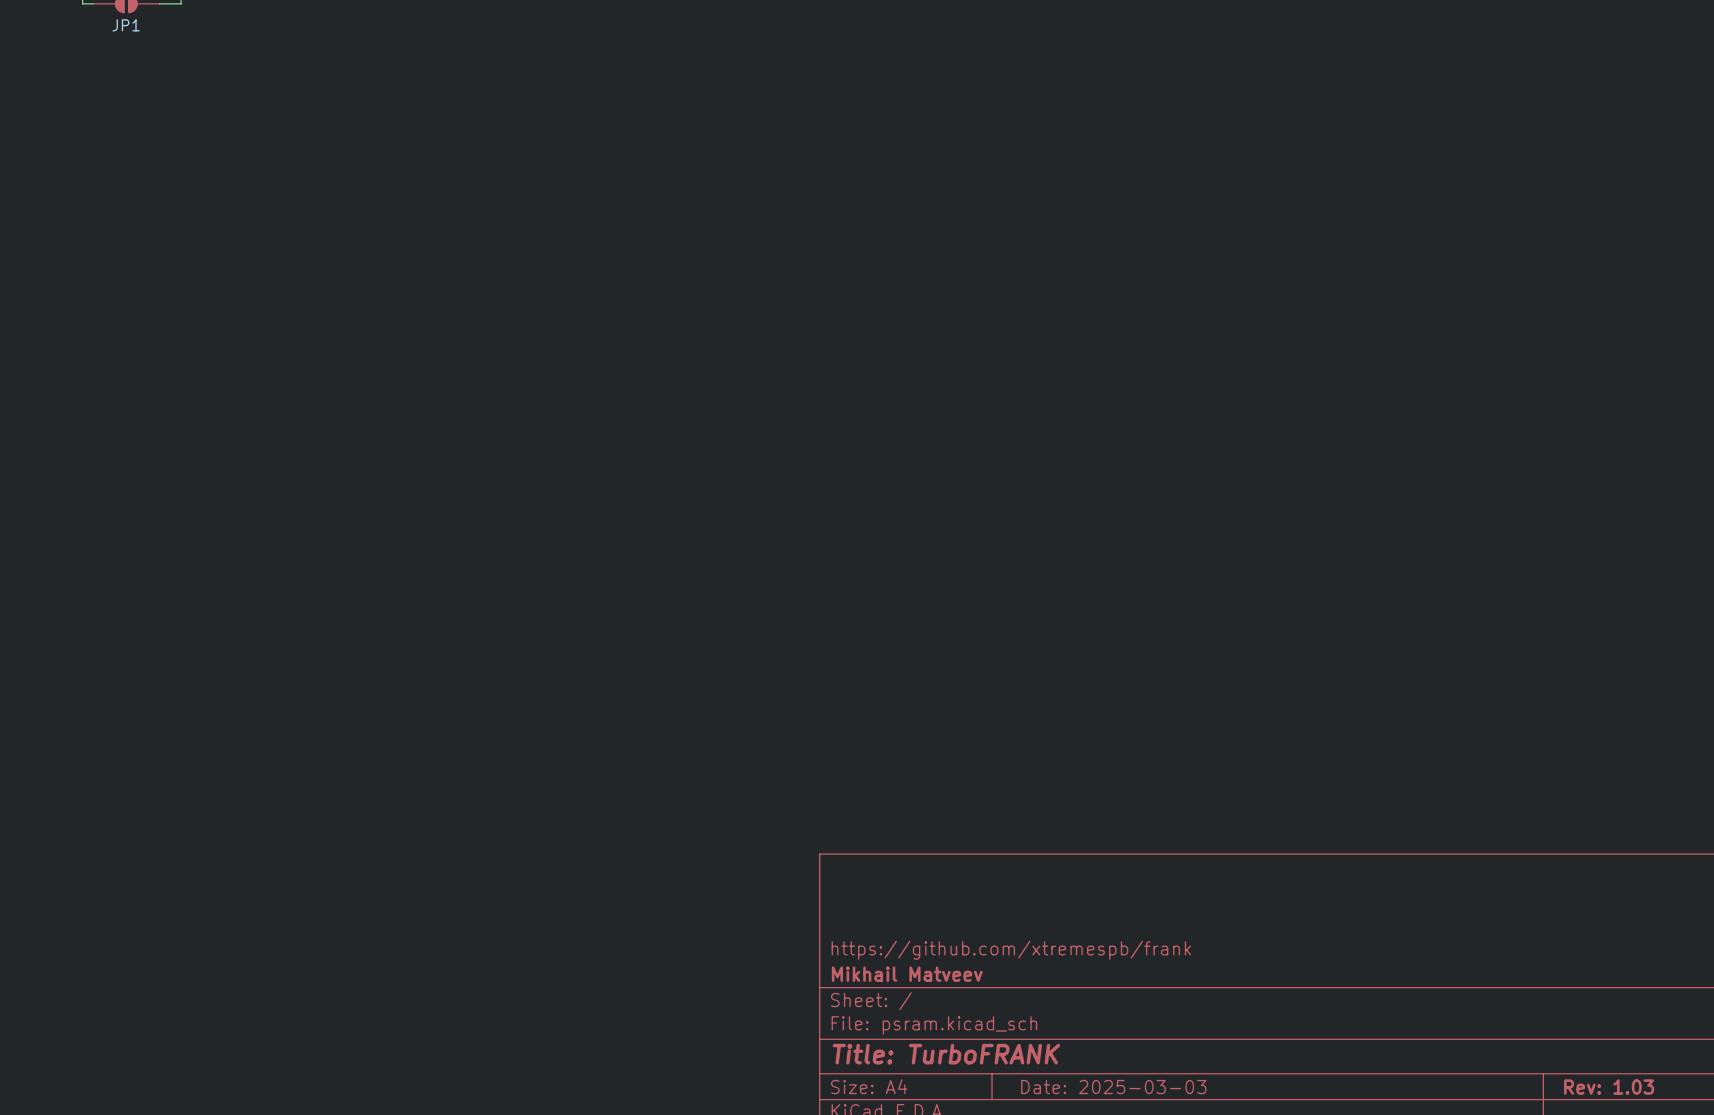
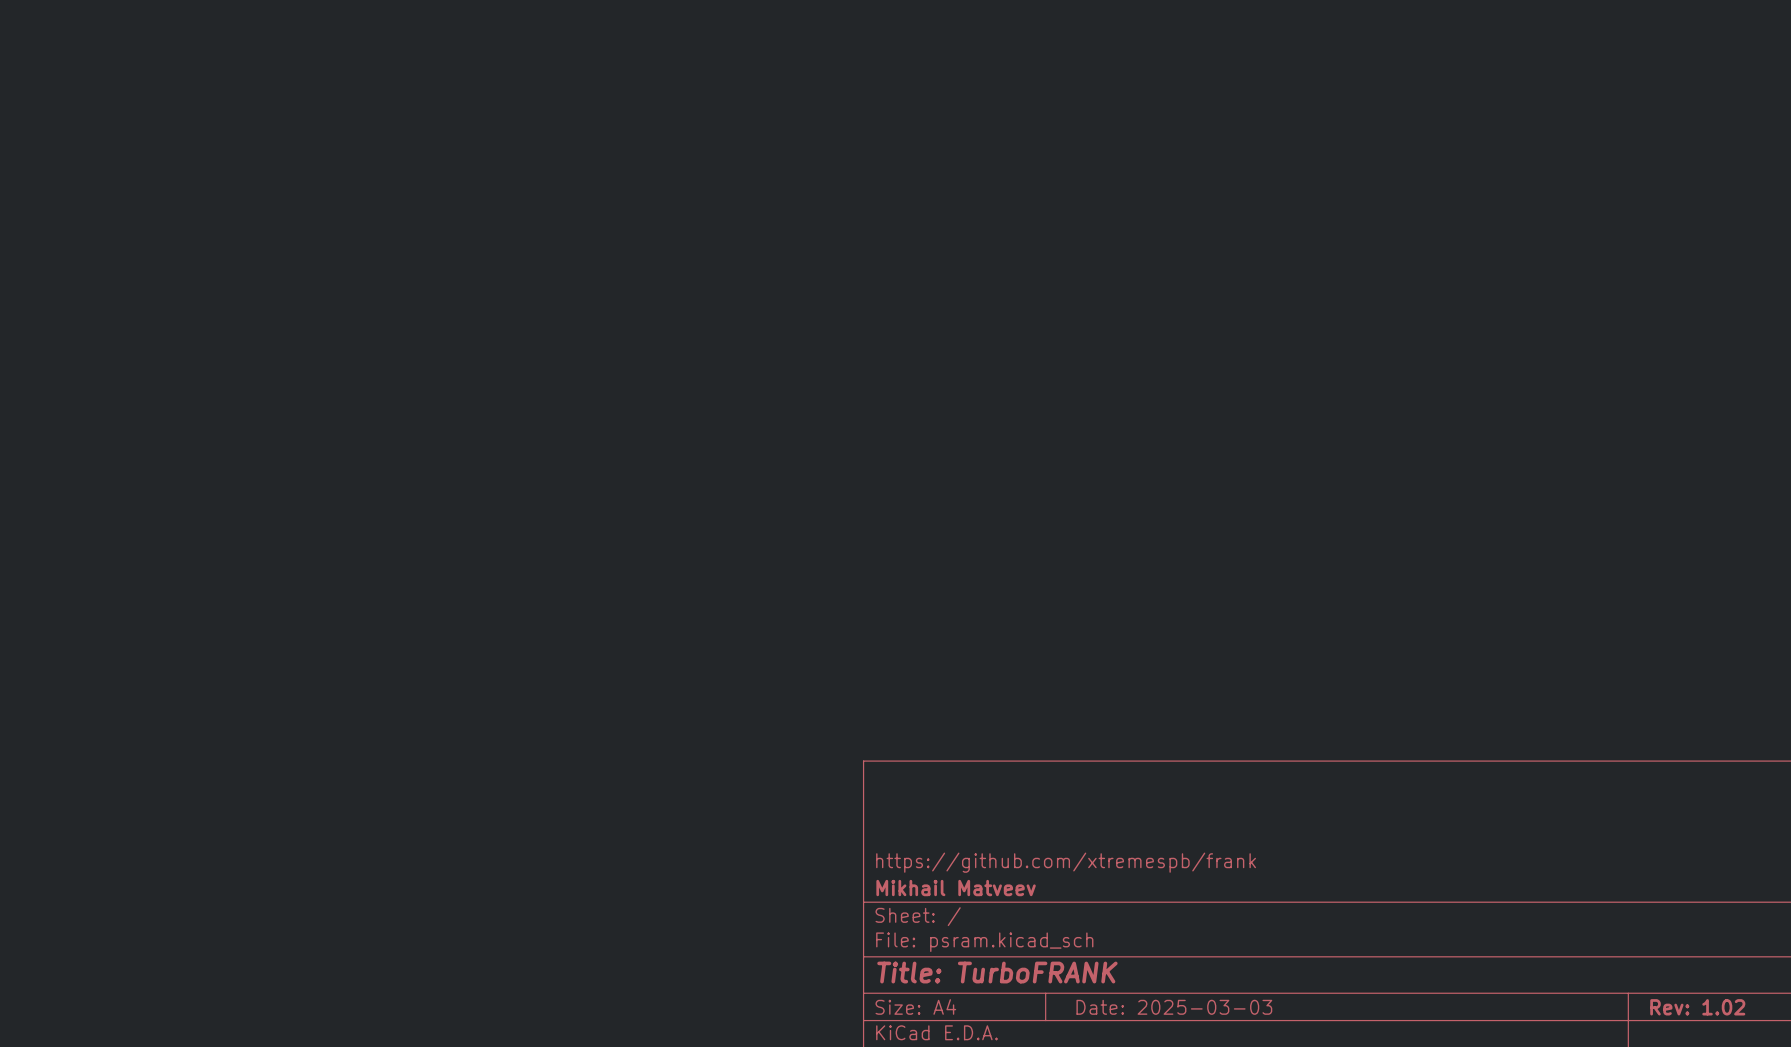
title block: Rev: 1.03 (1609, 1087) -> Rev: 1.02 (1697, 1007)

